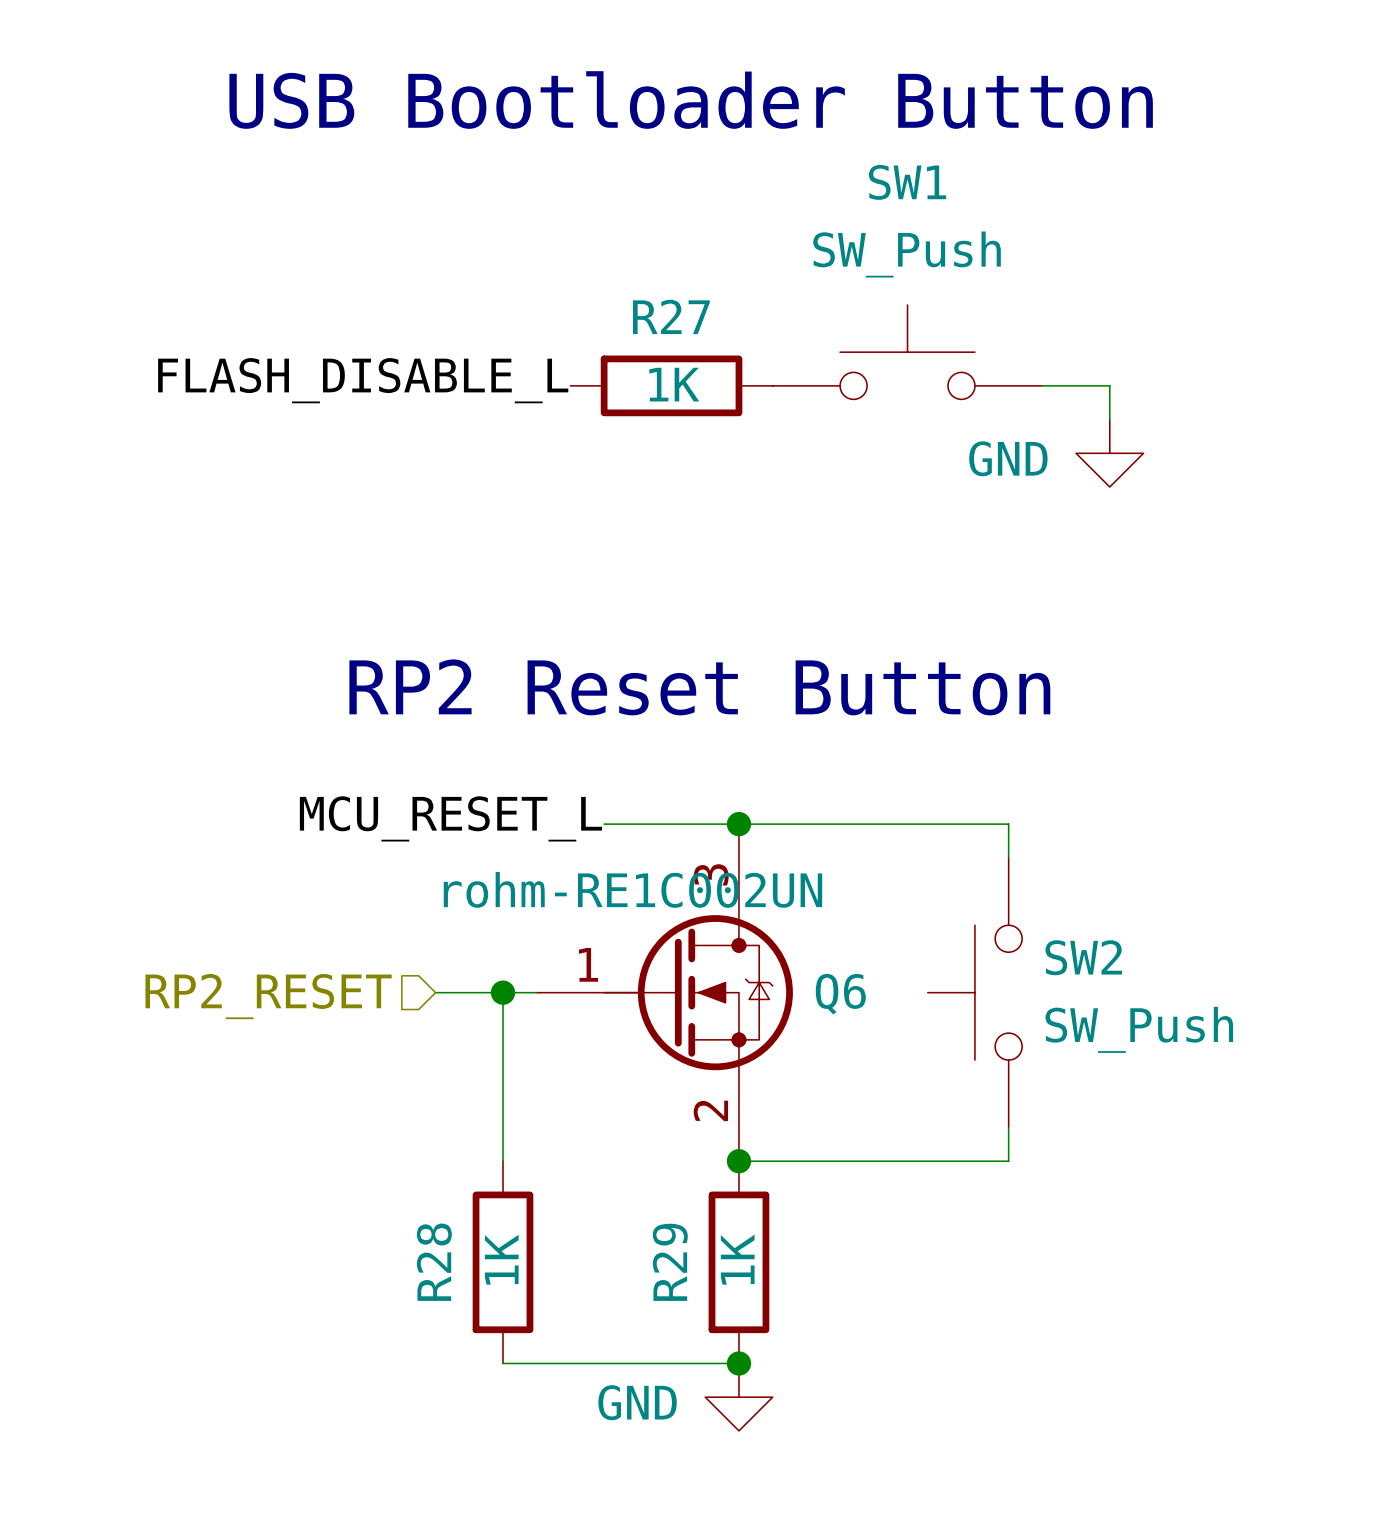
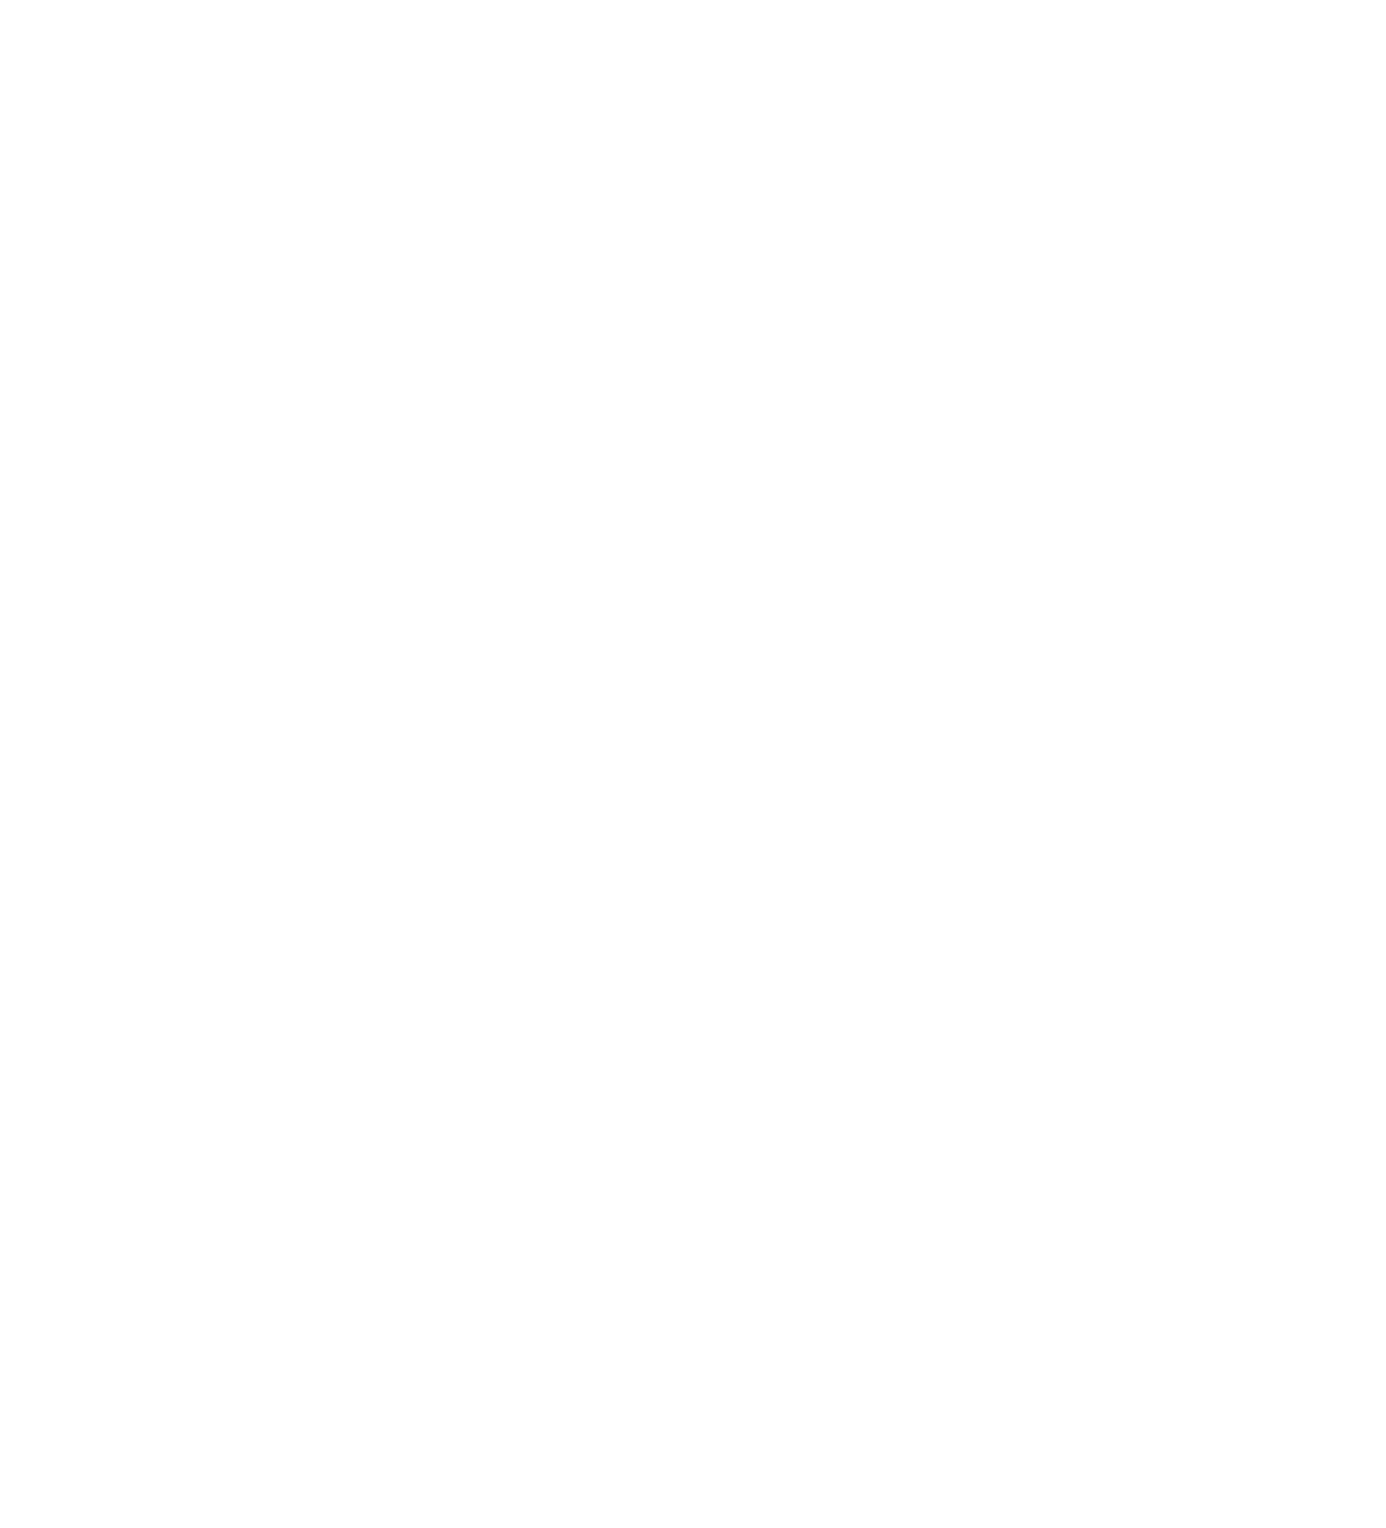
text: USB Bootloader Button (691, 100) -> none
SW1: SW_Push (907, 352) -> none
label: FLASH_DISABLE_L (363, 380) -> none
R27: 1K (671, 385) -> none
wire: (1042, 385) (1109, 385) (1109, 419) -> none
power symbol: GND (1109, 453) -> none
text: RP2 Reset Button (699, 687) -> none
label: MCU_RESET_L (450, 818) -> none
wire: (604, 824) (1008, 824) (1008, 857) -> none
junction: (738, 824) -> none
wire: (435, 992) (536, 992) -> none
wire: (503, 992) (503, 1161) -> none
junction: (503, 992) -> none
Q6: rohm-RE1C002UN (664, 992) -> none
SW2: SW_Push (974, 992) -> none
hierarchical label: RP2_RESET (268, 996) -> none
wire: (1008, 1127) (1008, 1161) (738, 1161) -> none
junction: (738, 1161) -> none
R28: 1K (503, 1262) -> none
R29: 1K (738, 1262) -> none
wire: (503, 1363) (738, 1363) -> none
junction: (738, 1363) -> none
power symbol: GND (738, 1397) -> none

